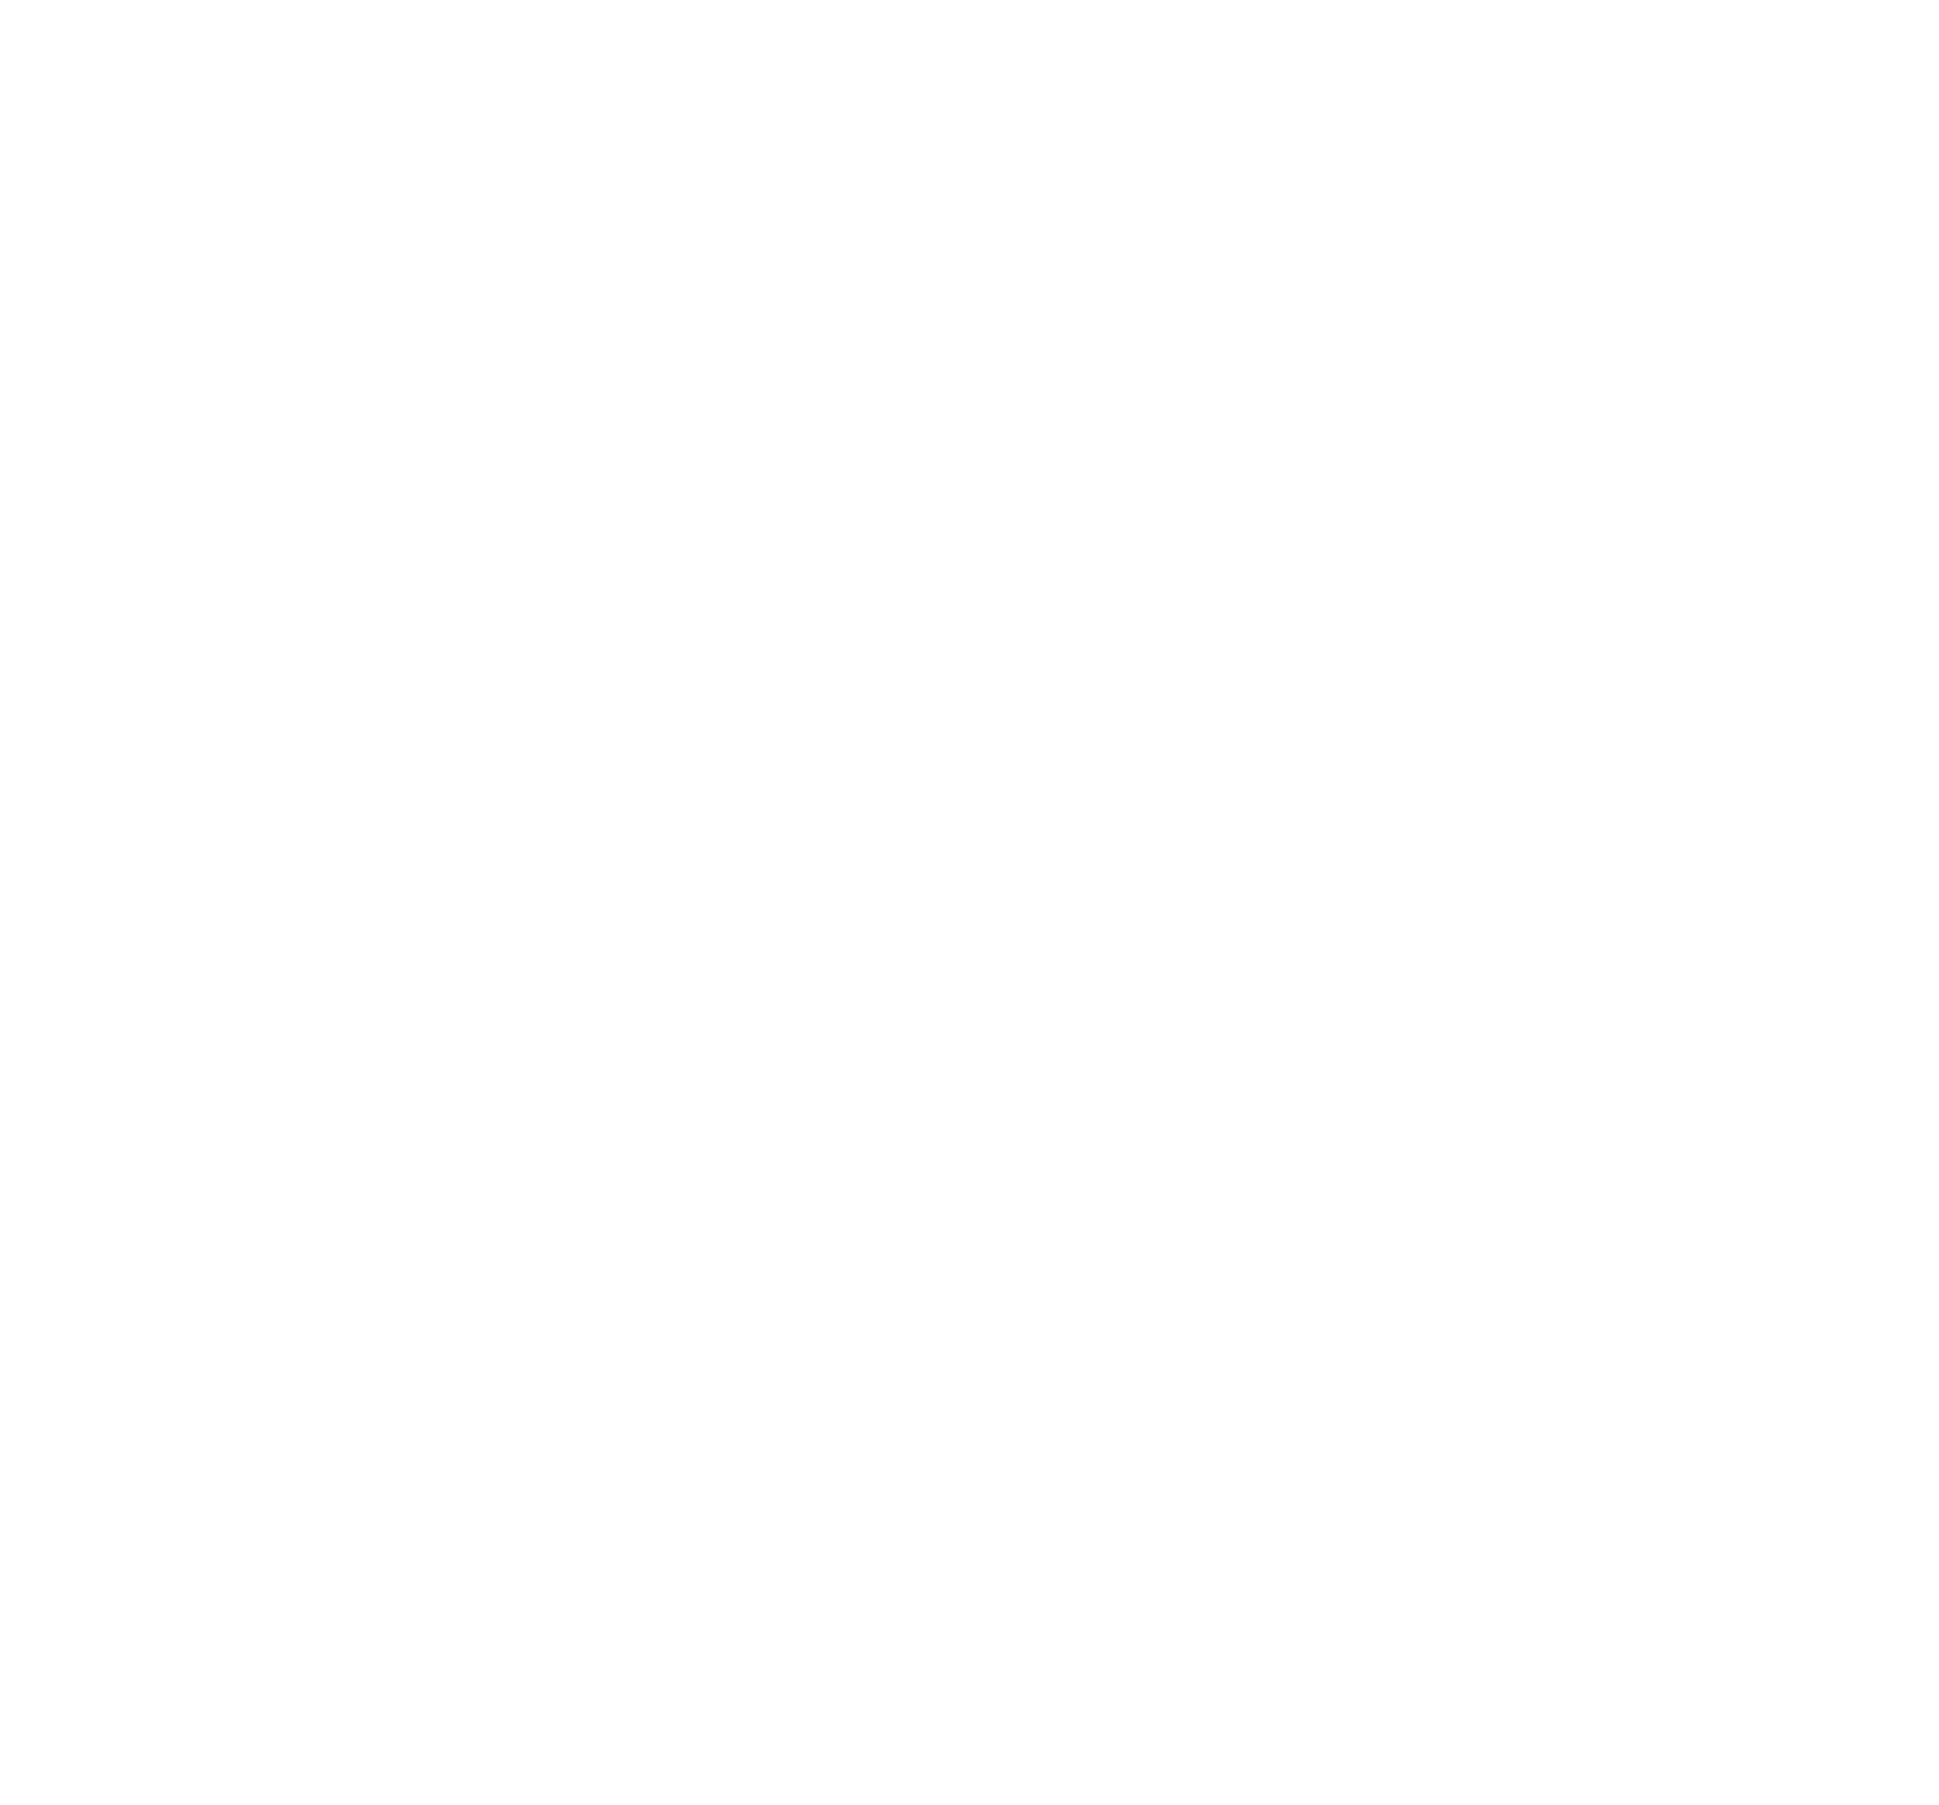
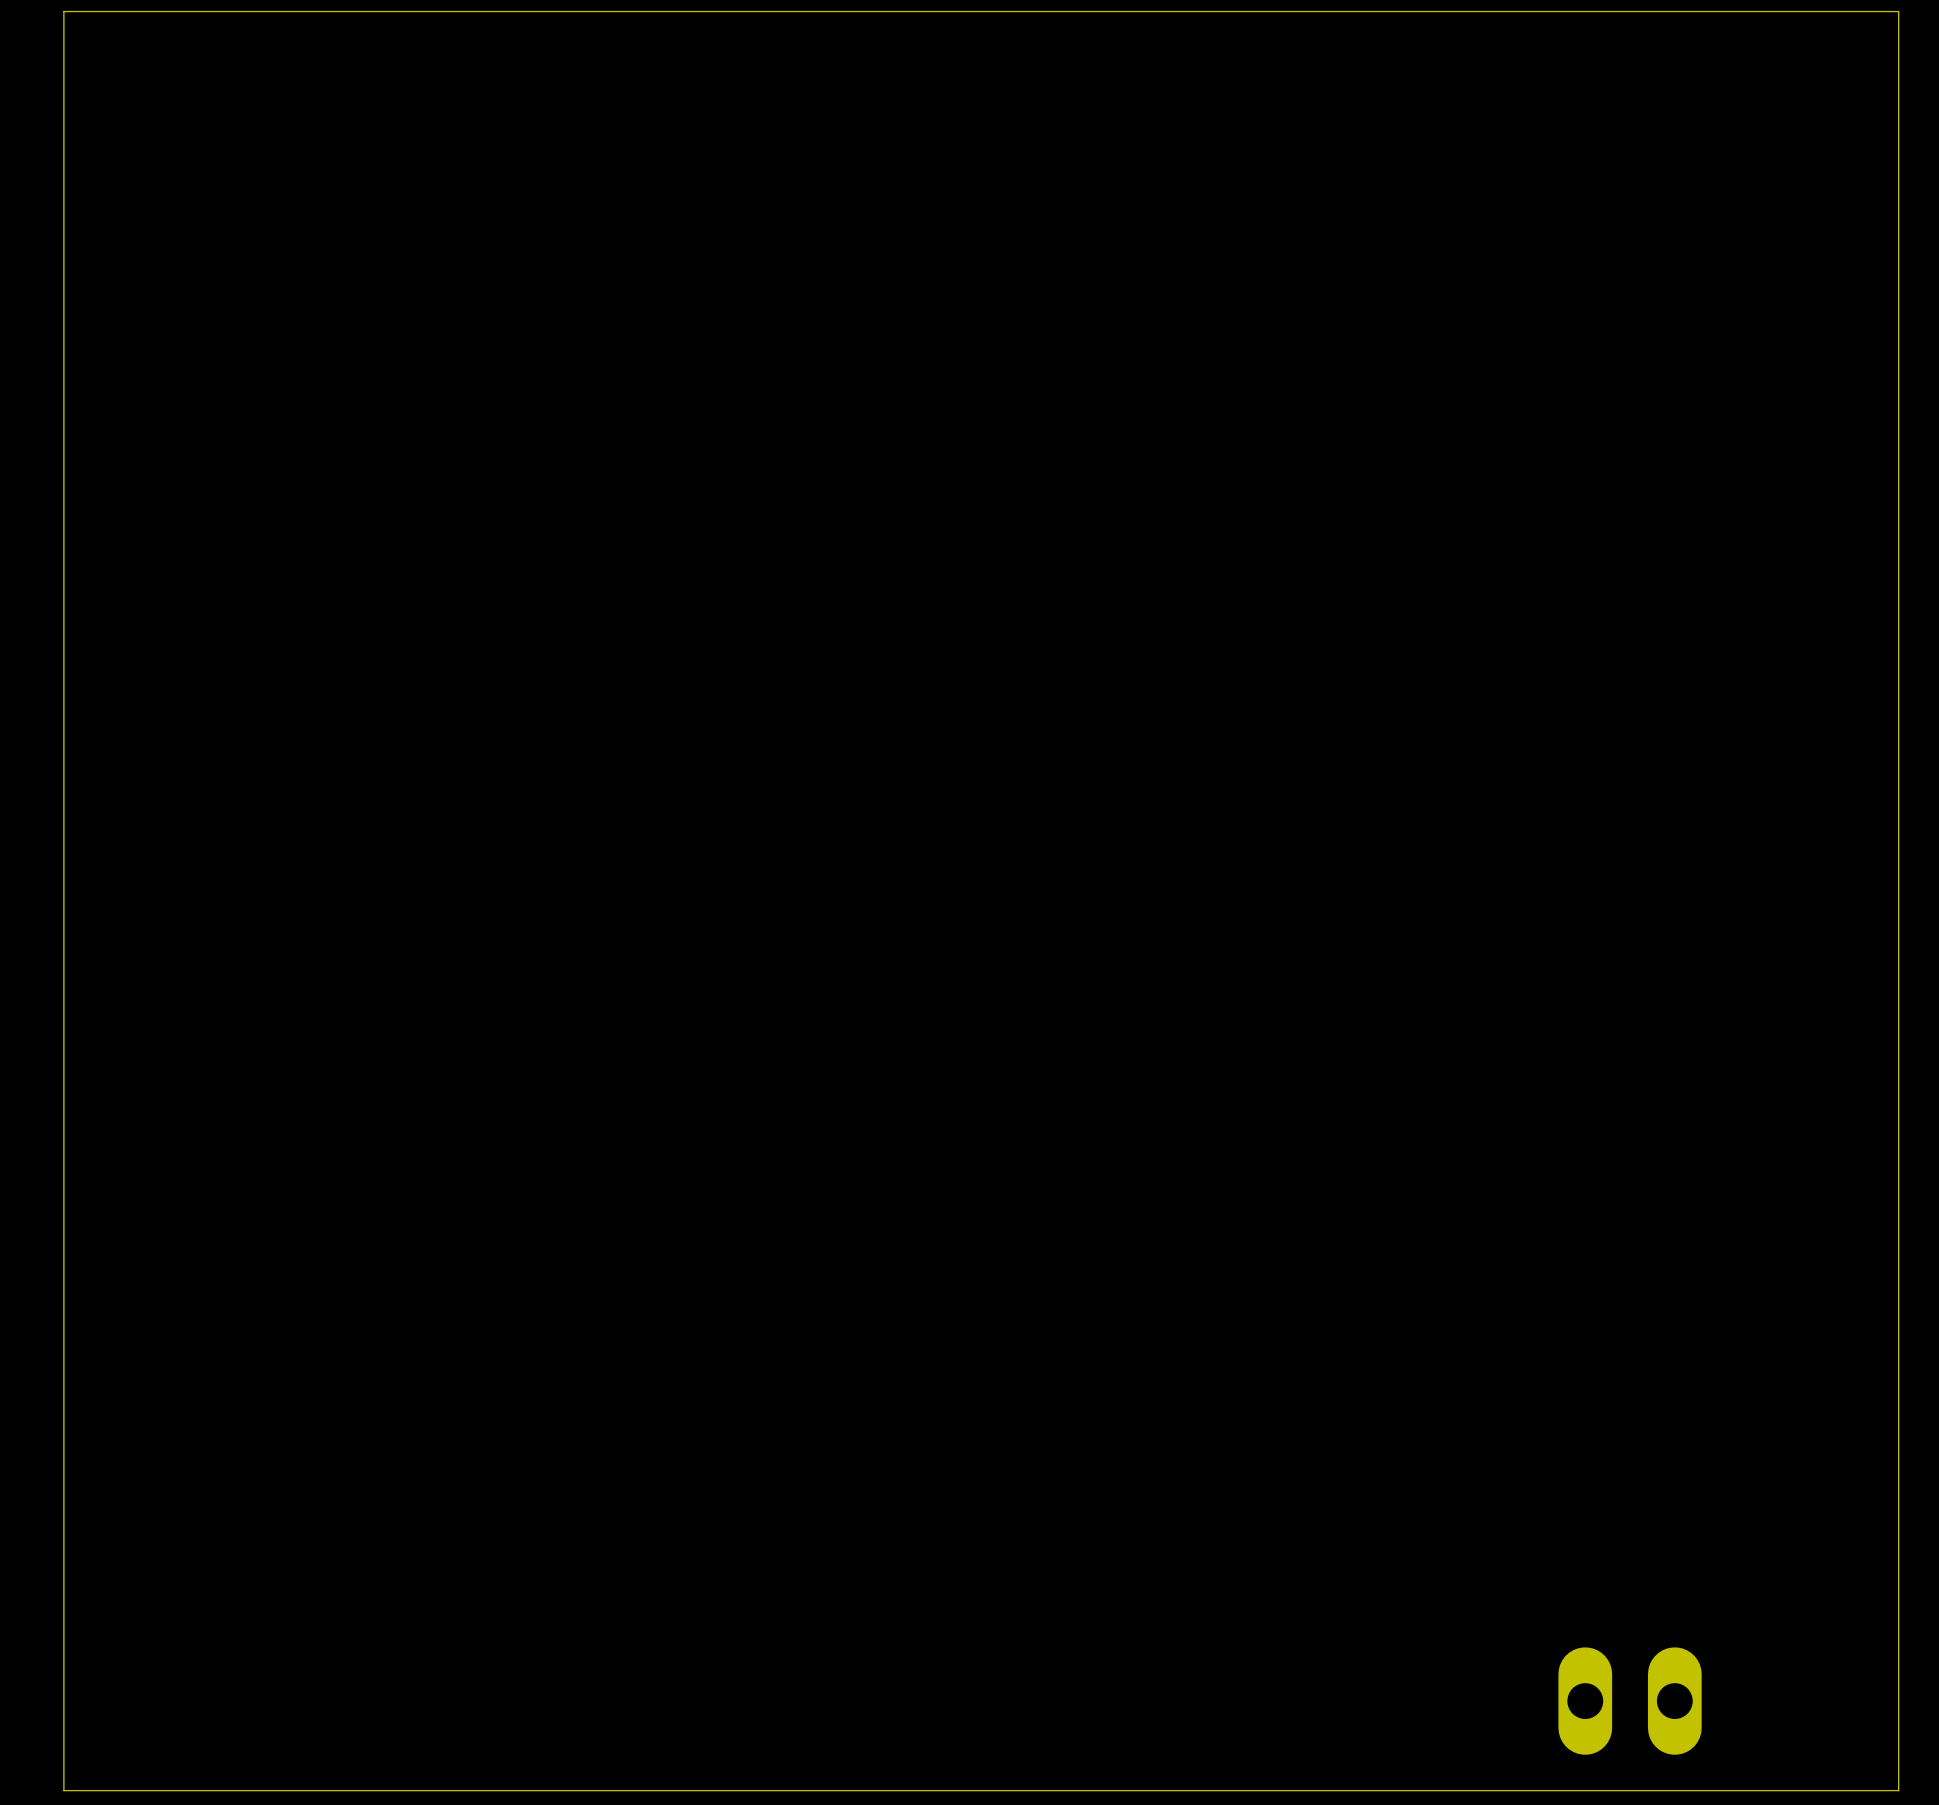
board edge: none -> (1898, 11) (63, 11) (63, 1790) (1898, 1790) (1898, 11)
part: none -> (1630, 1701)

